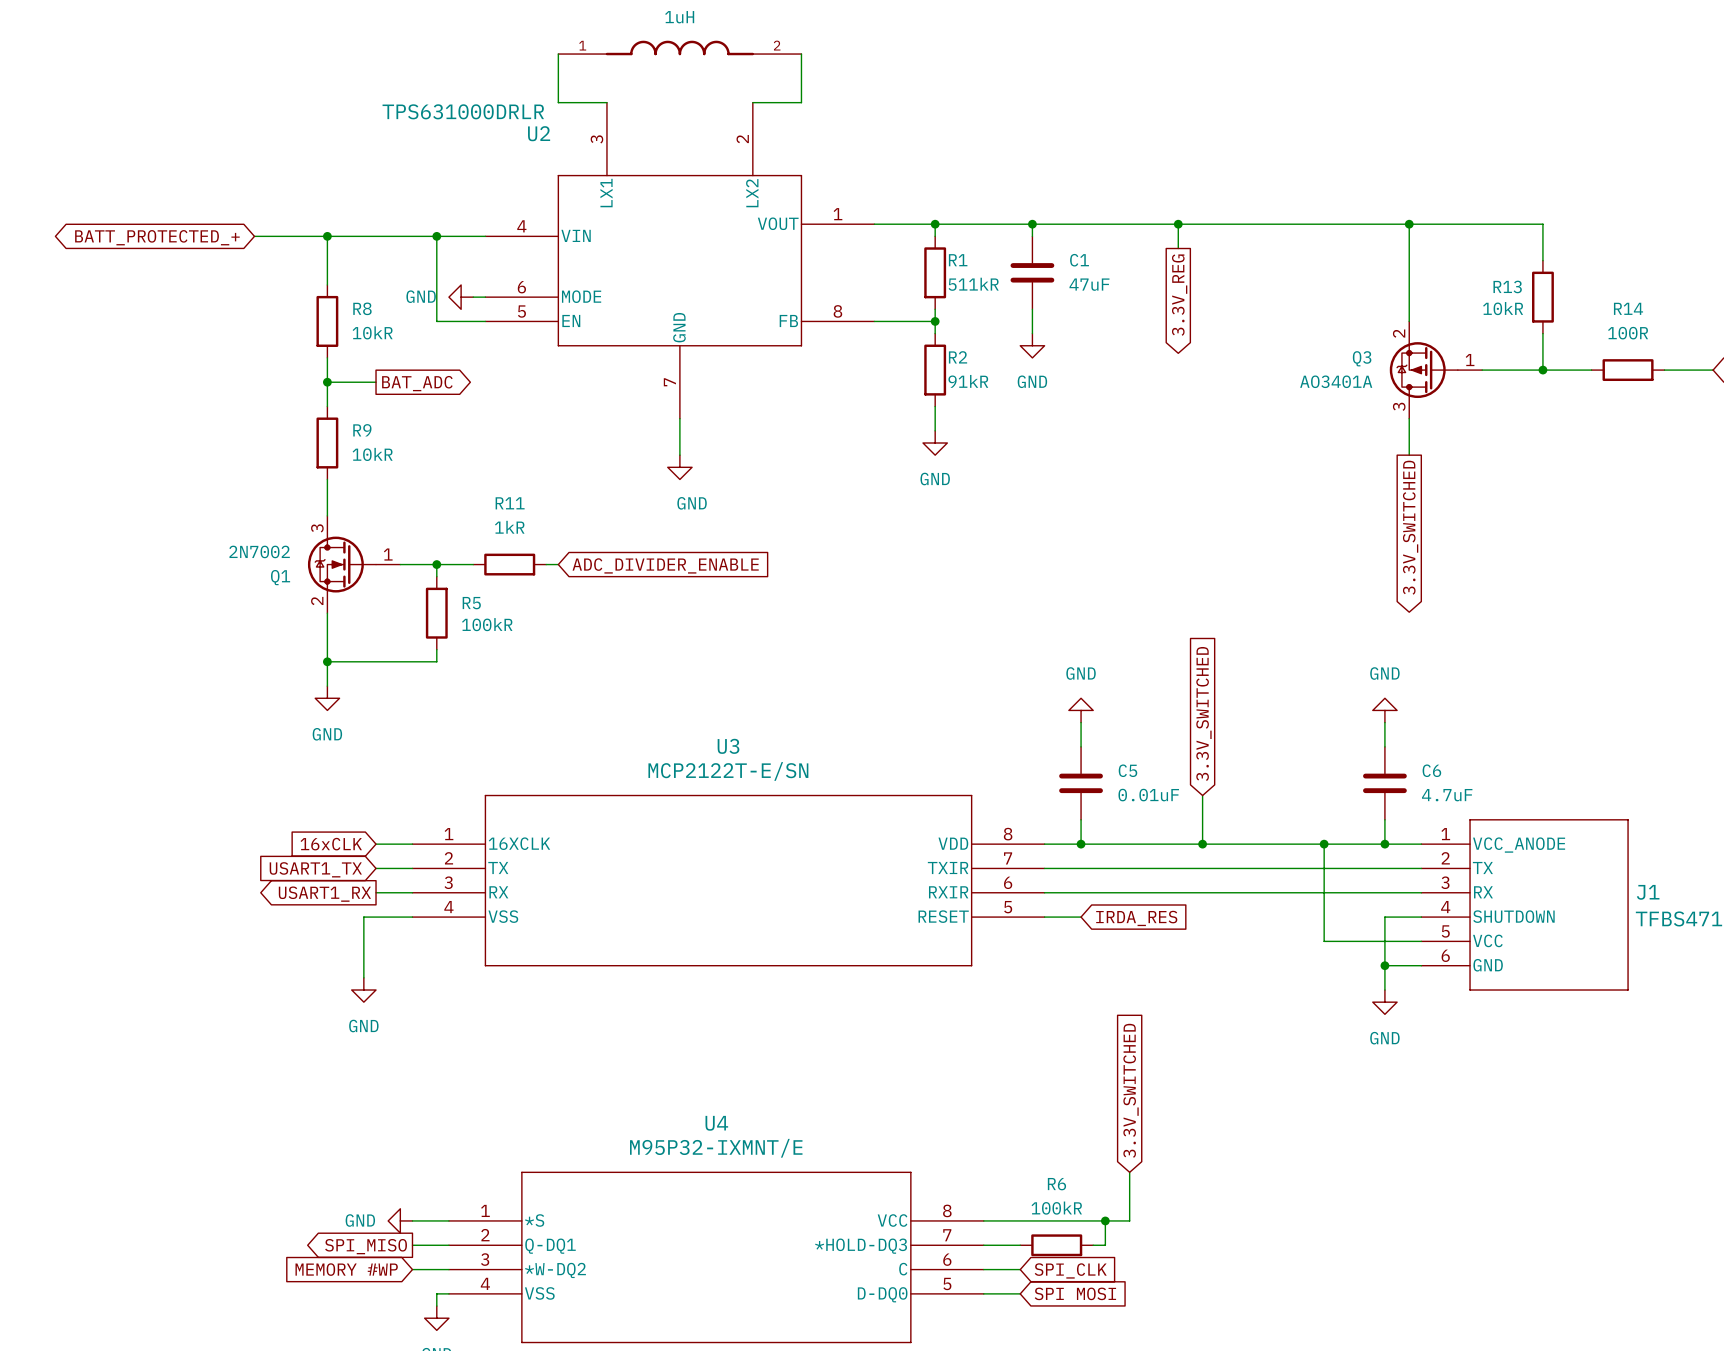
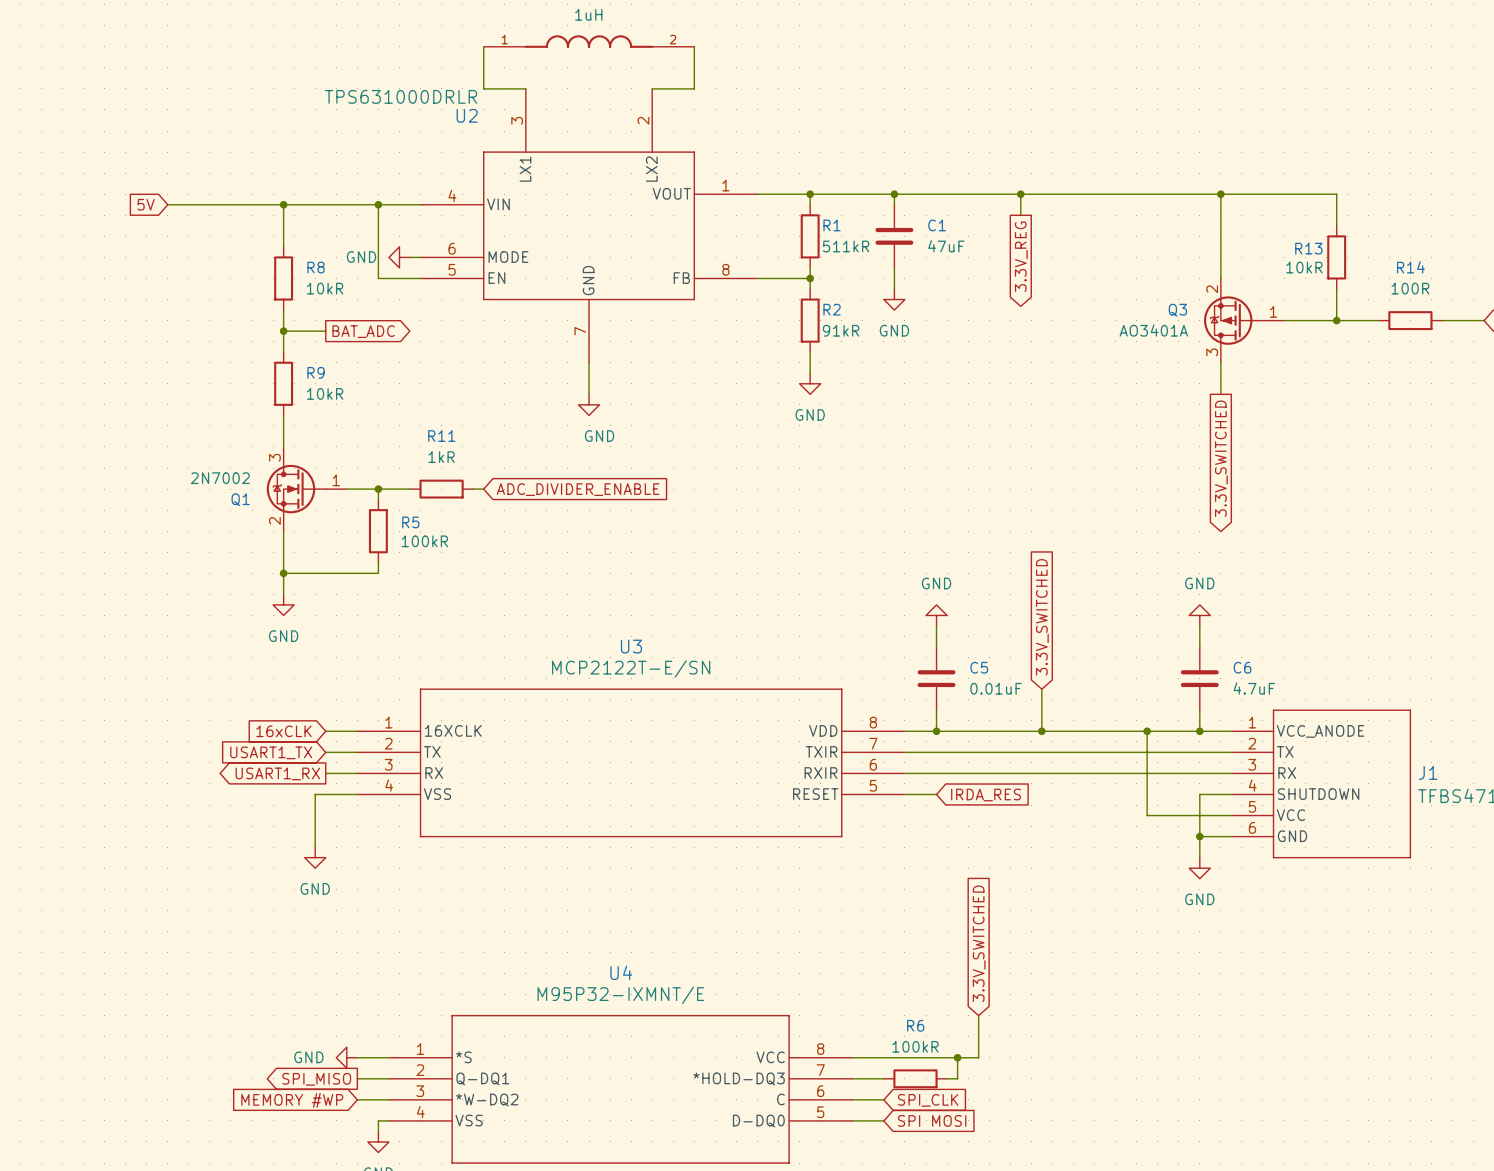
global label: none -> 5V (146, 204)
wire: none -> (167, 204) (220, 204)
global label: BATT_PROTECTED_+ (157, 237) -> none

